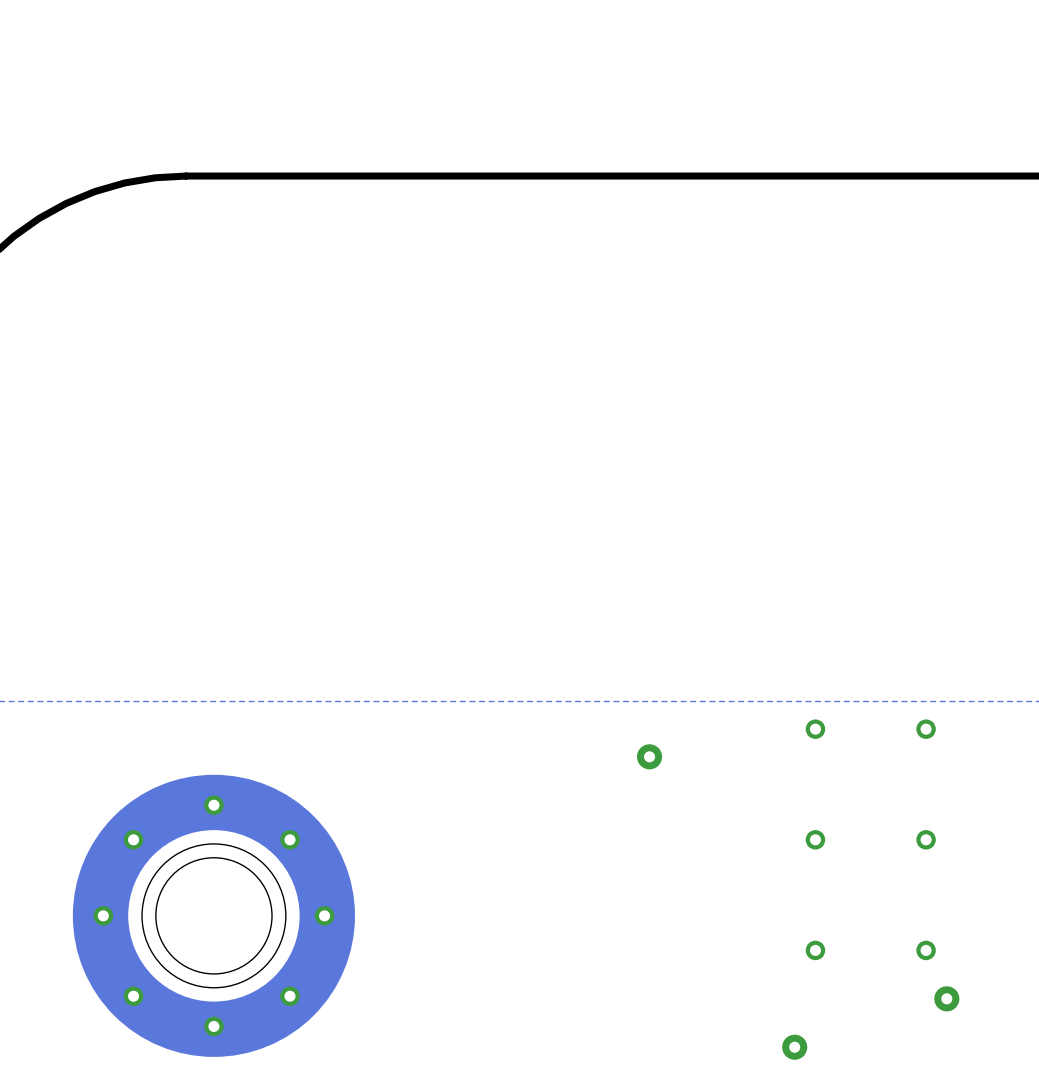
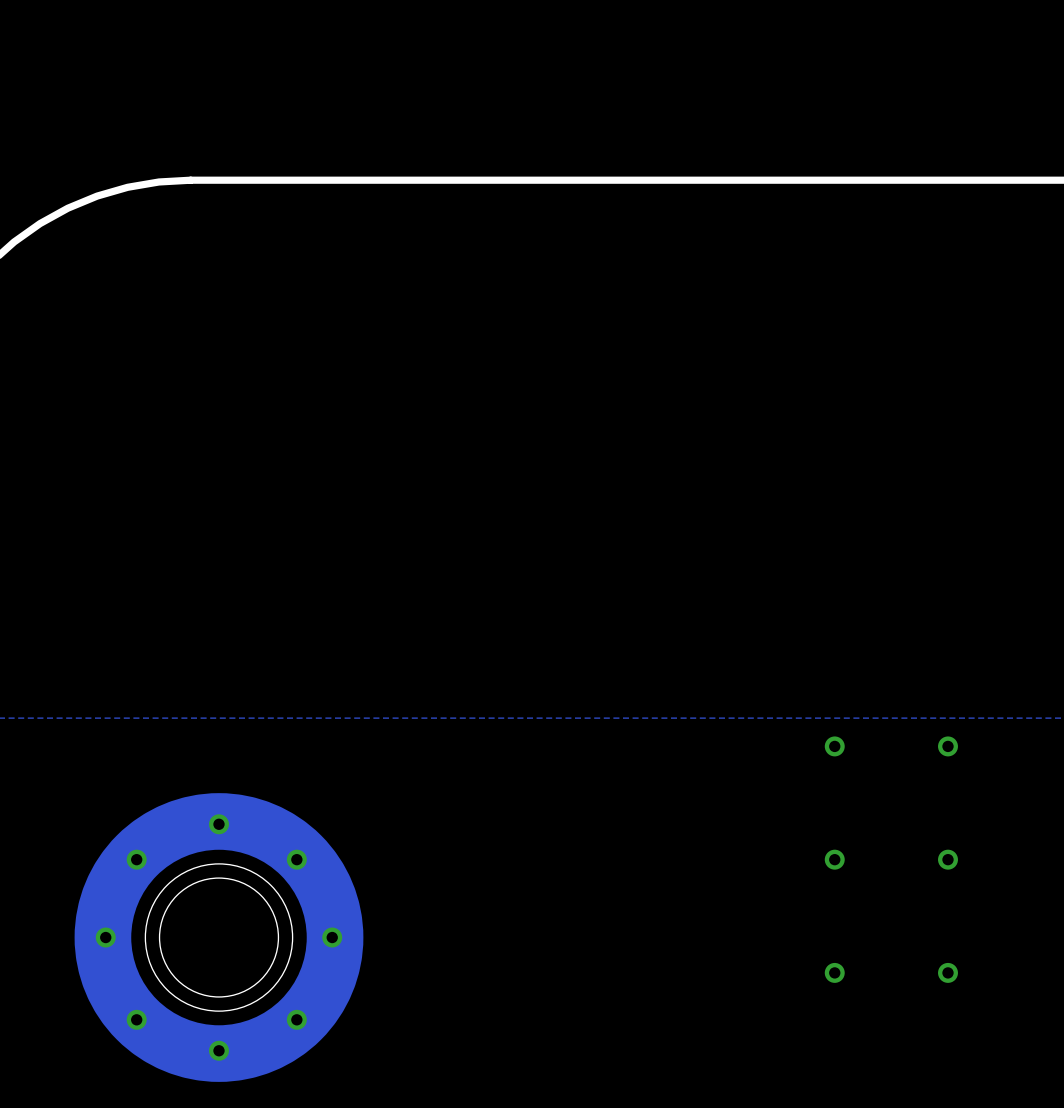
via: (649, 756) -> none
via: (946, 998) -> none
via: (794, 1047) -> none

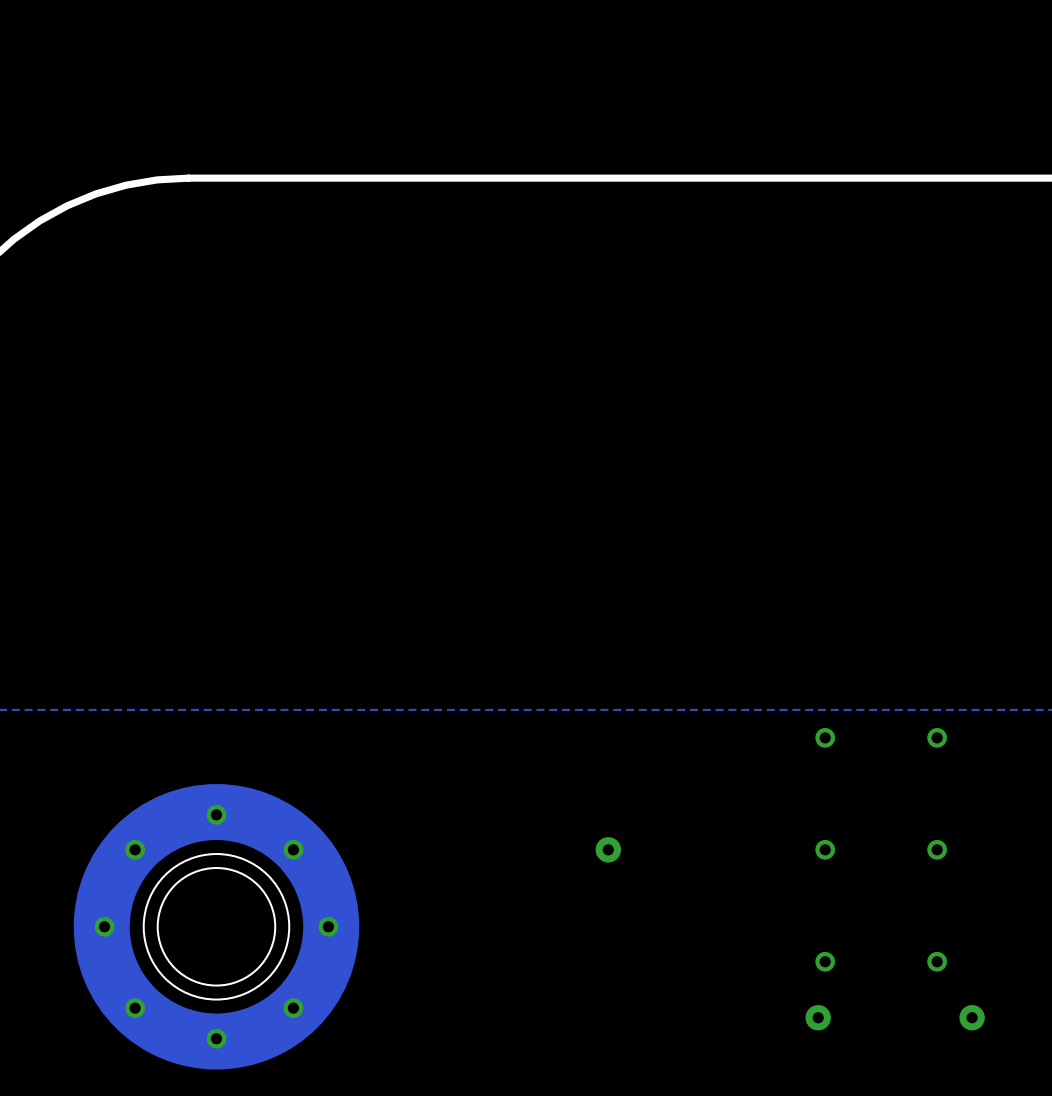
via: none -> (608, 849)
via: none -> (818, 1017)
via: none -> (972, 1017)

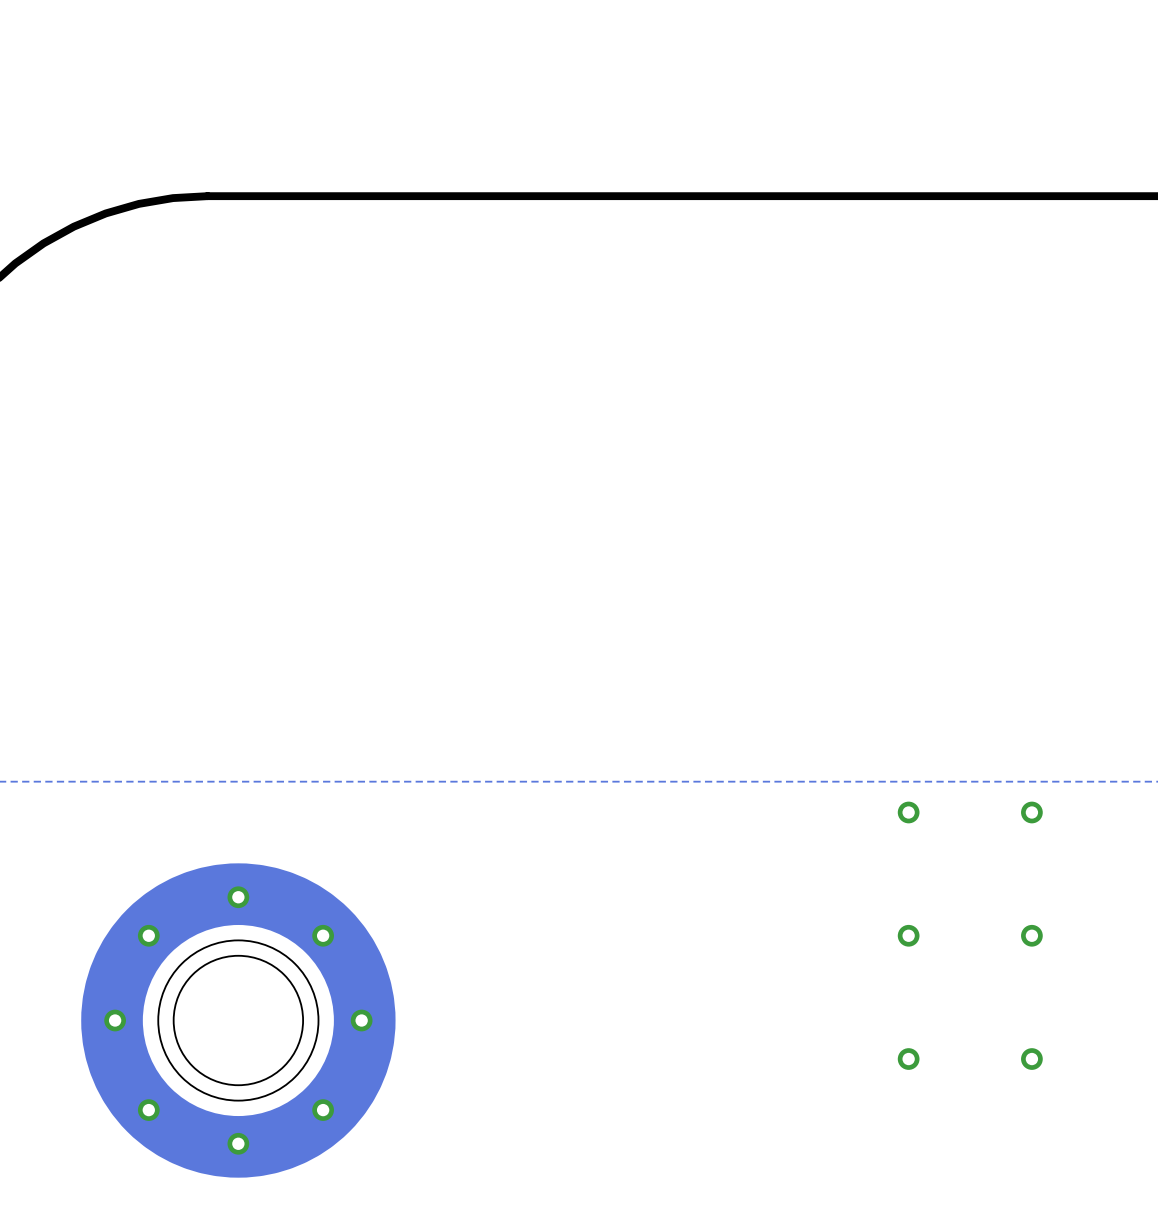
via: (608, 849) -> none
via: (818, 1017) -> none
via: (972, 1017) -> none

